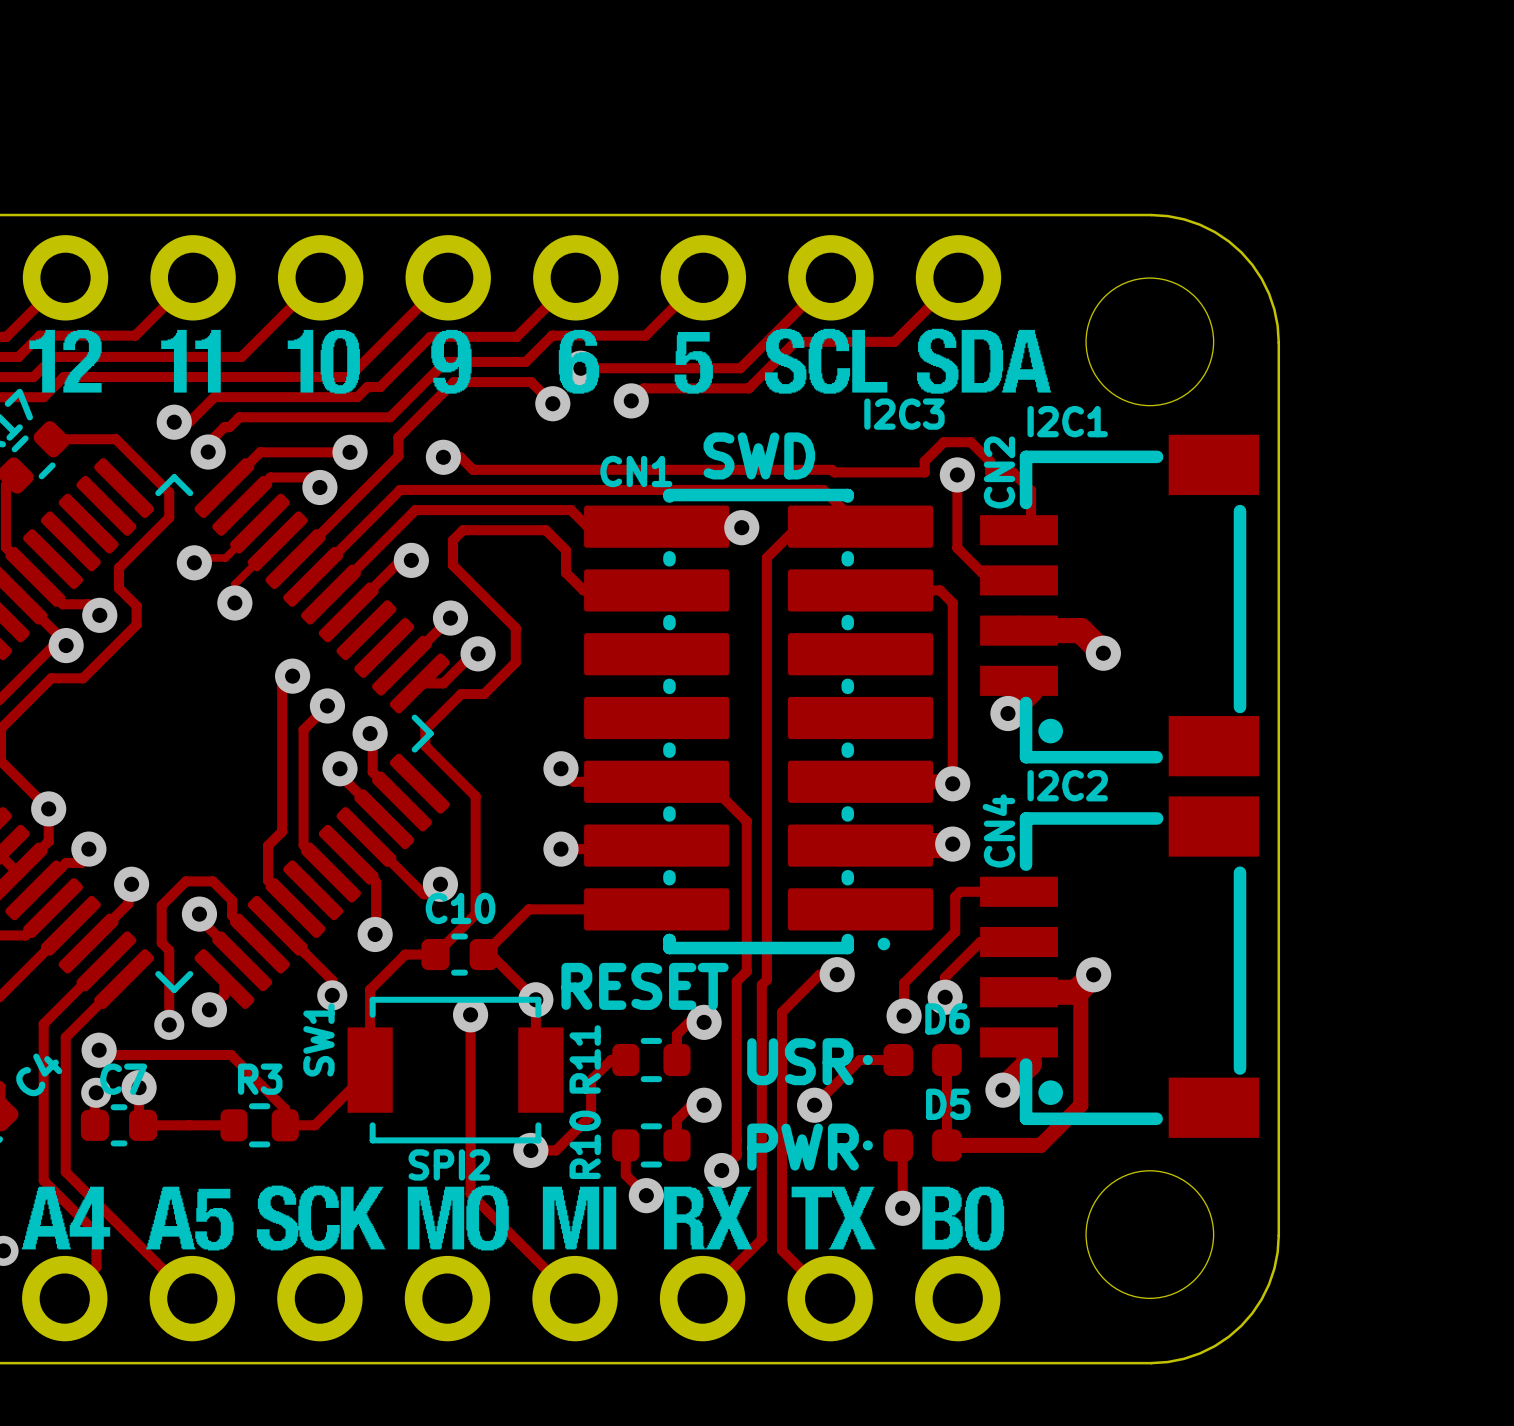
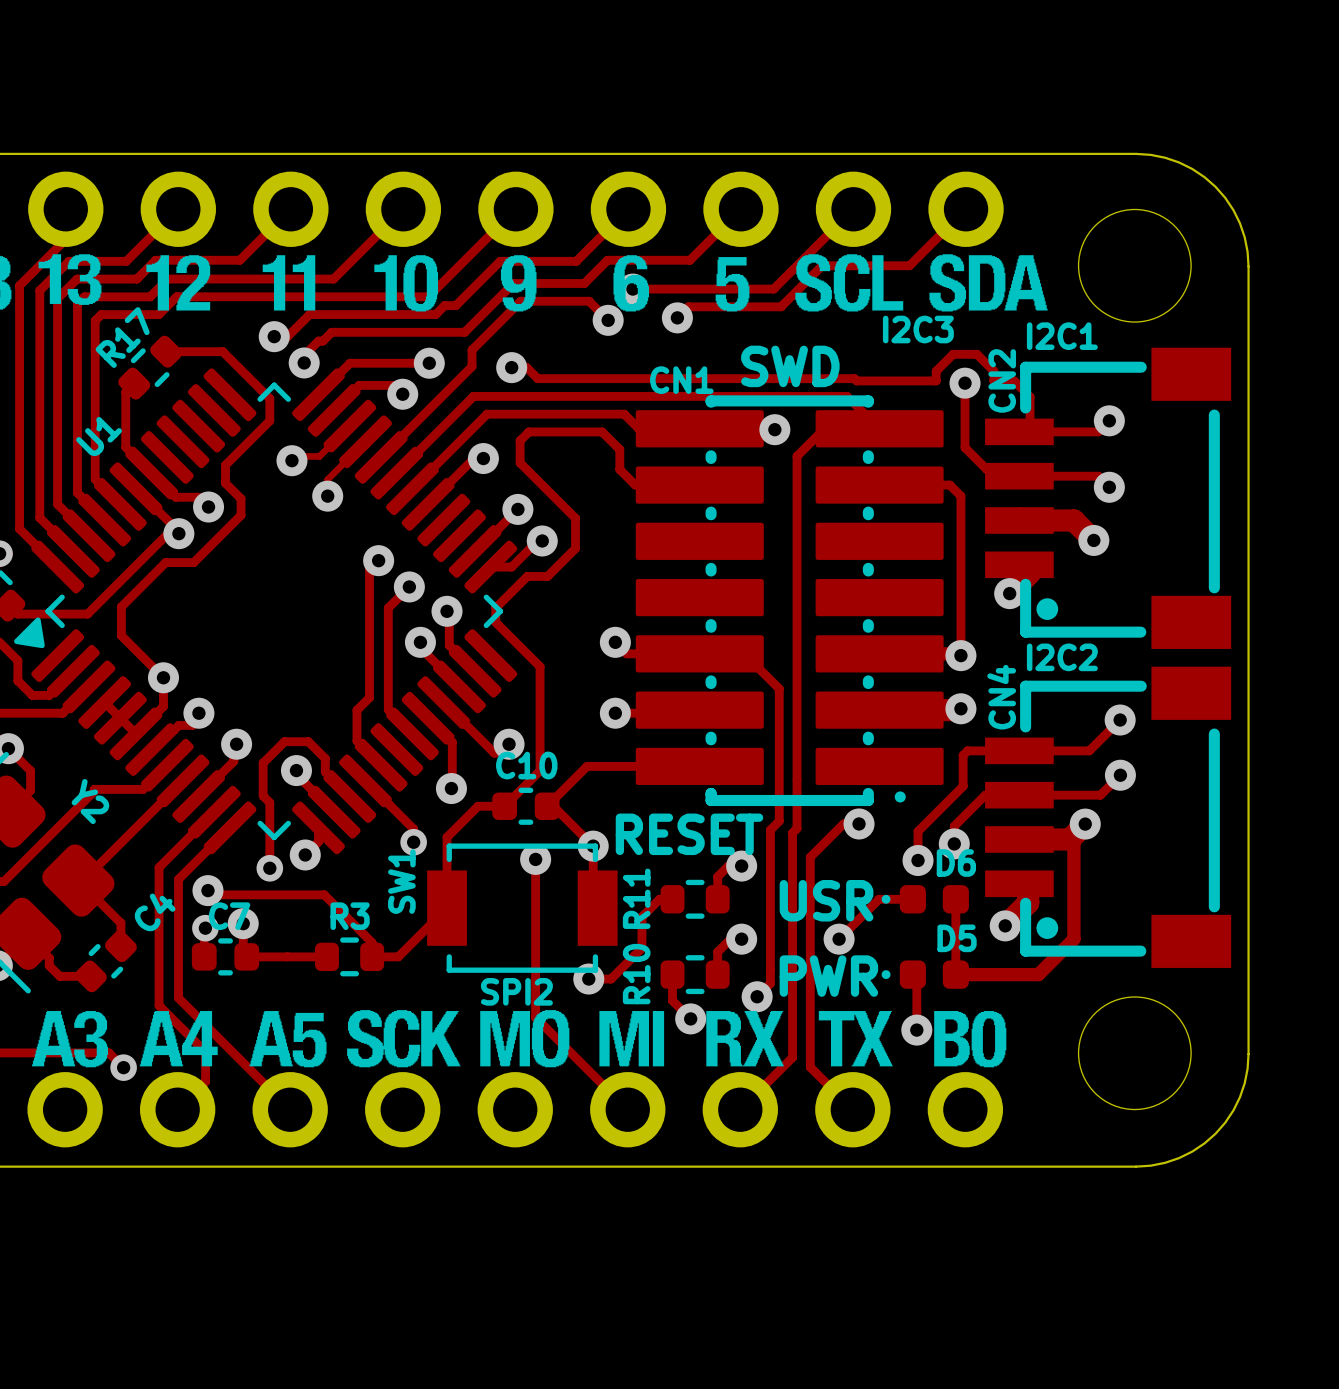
track: none -> (1109, 420) (1098, 431) (1019, 431)
via: none -> (1109, 420)
track: none -> (1019, 476) (1098, 476) (1109, 487)
via: none -> (1109, 487)
track: none -> (1120, 720) (1089, 750) (1019, 750)
via: none -> (1120, 720)
track: none -> (1120, 775) (1100, 795) (1019, 795)
via: none -> (1120, 775)

